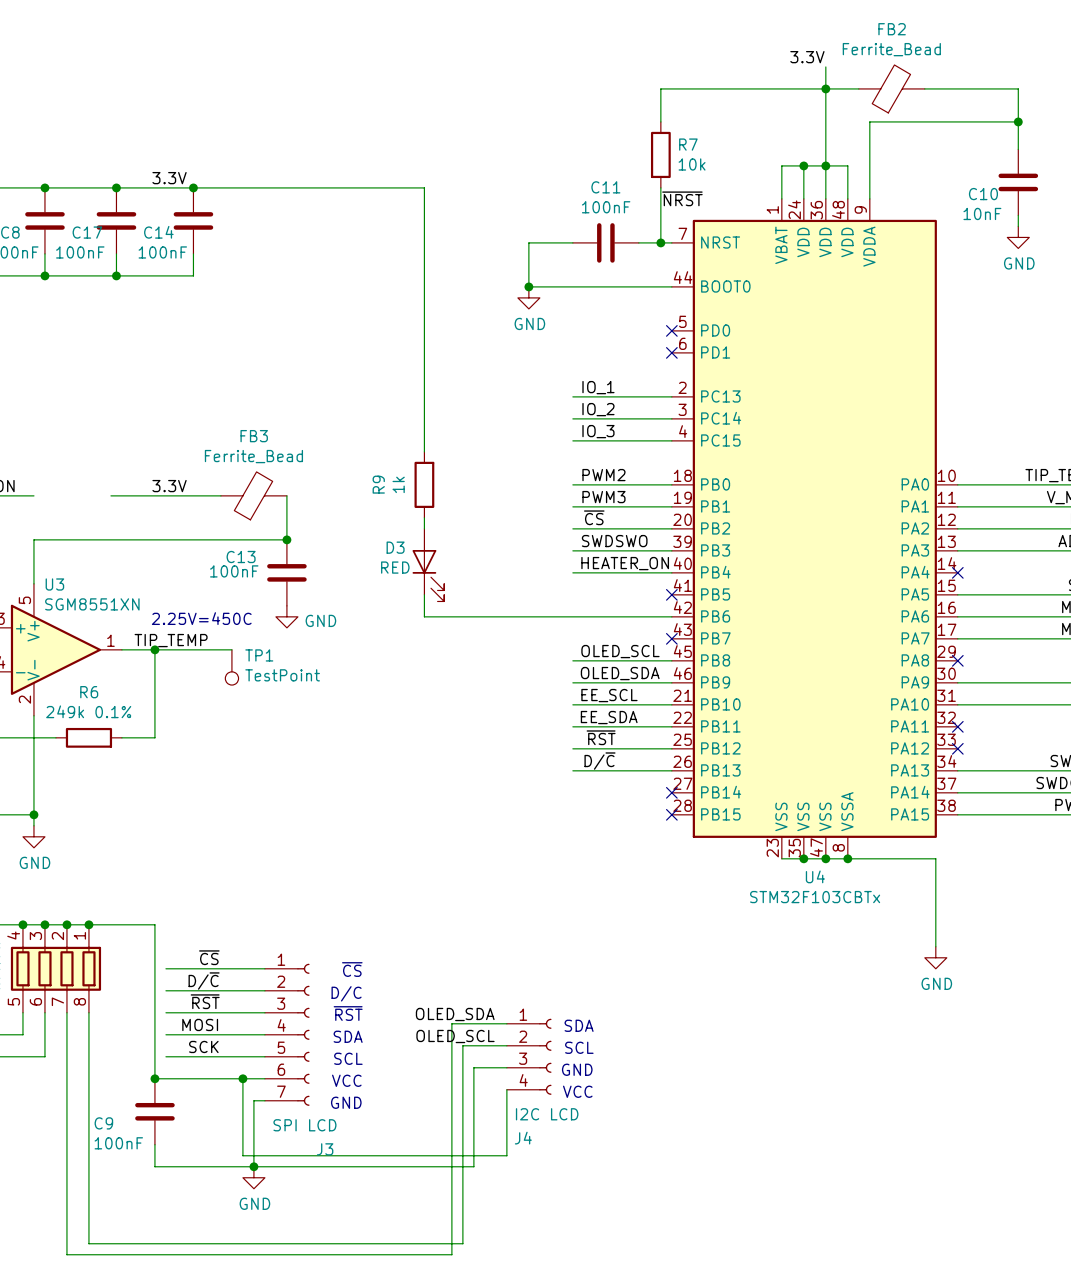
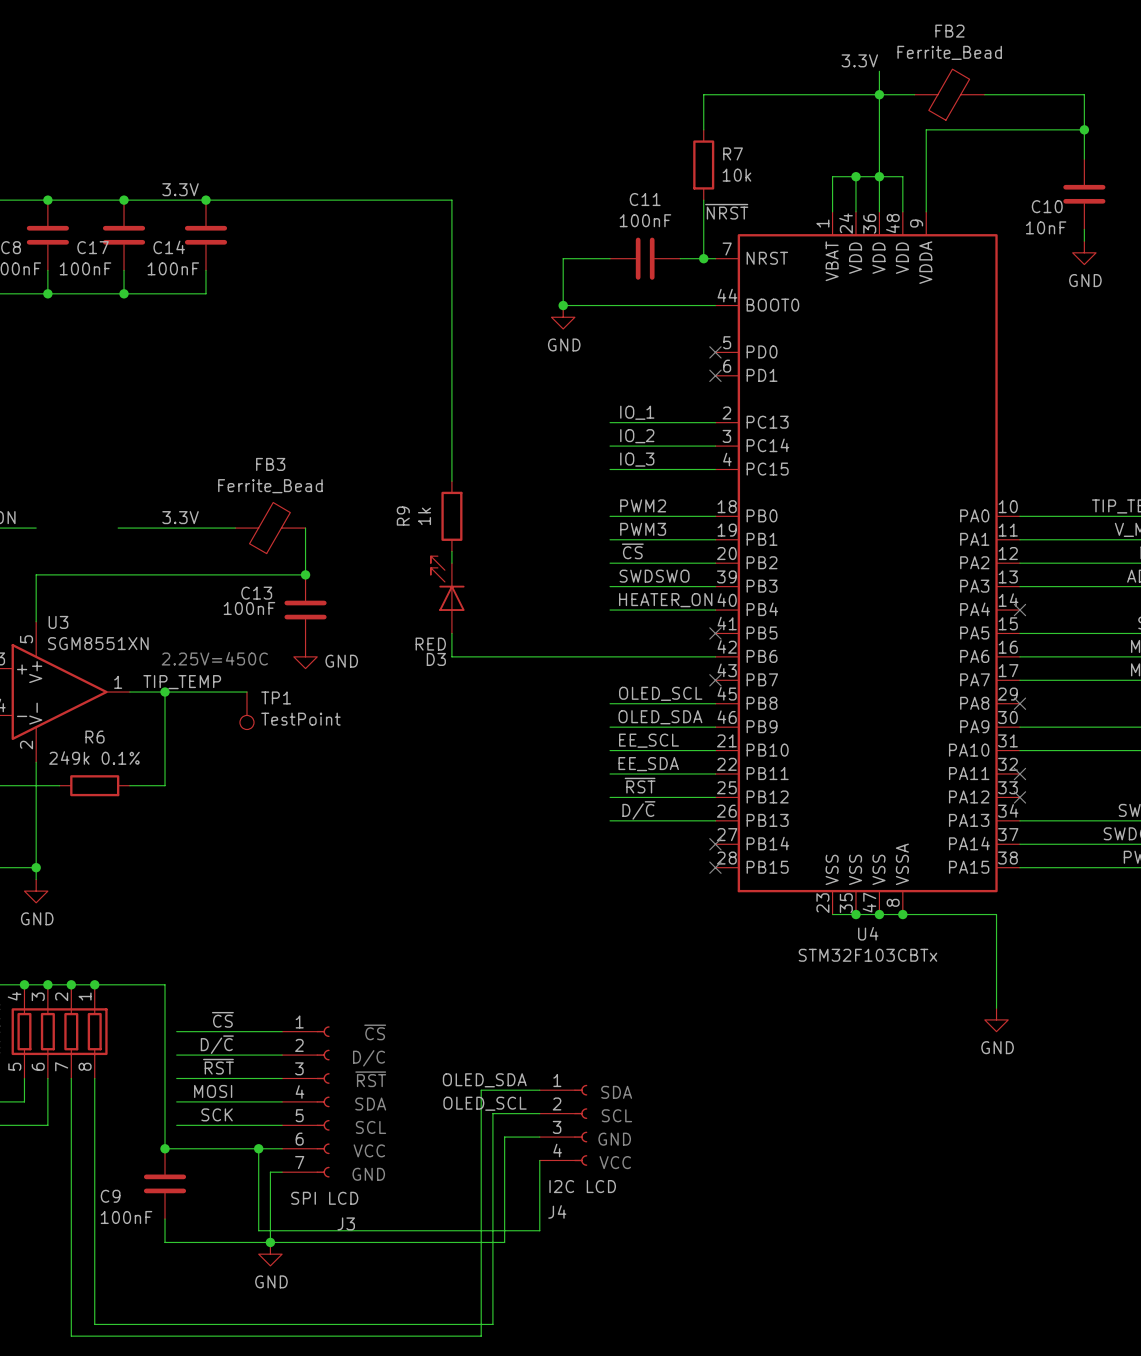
D3 name position: D3 (395, 547) -> D3 (436, 659)
D3 value position: RED (395, 567) -> RED (430, 644)
D3 rotation: 0° (428, 575) -> 180° (447, 583)

